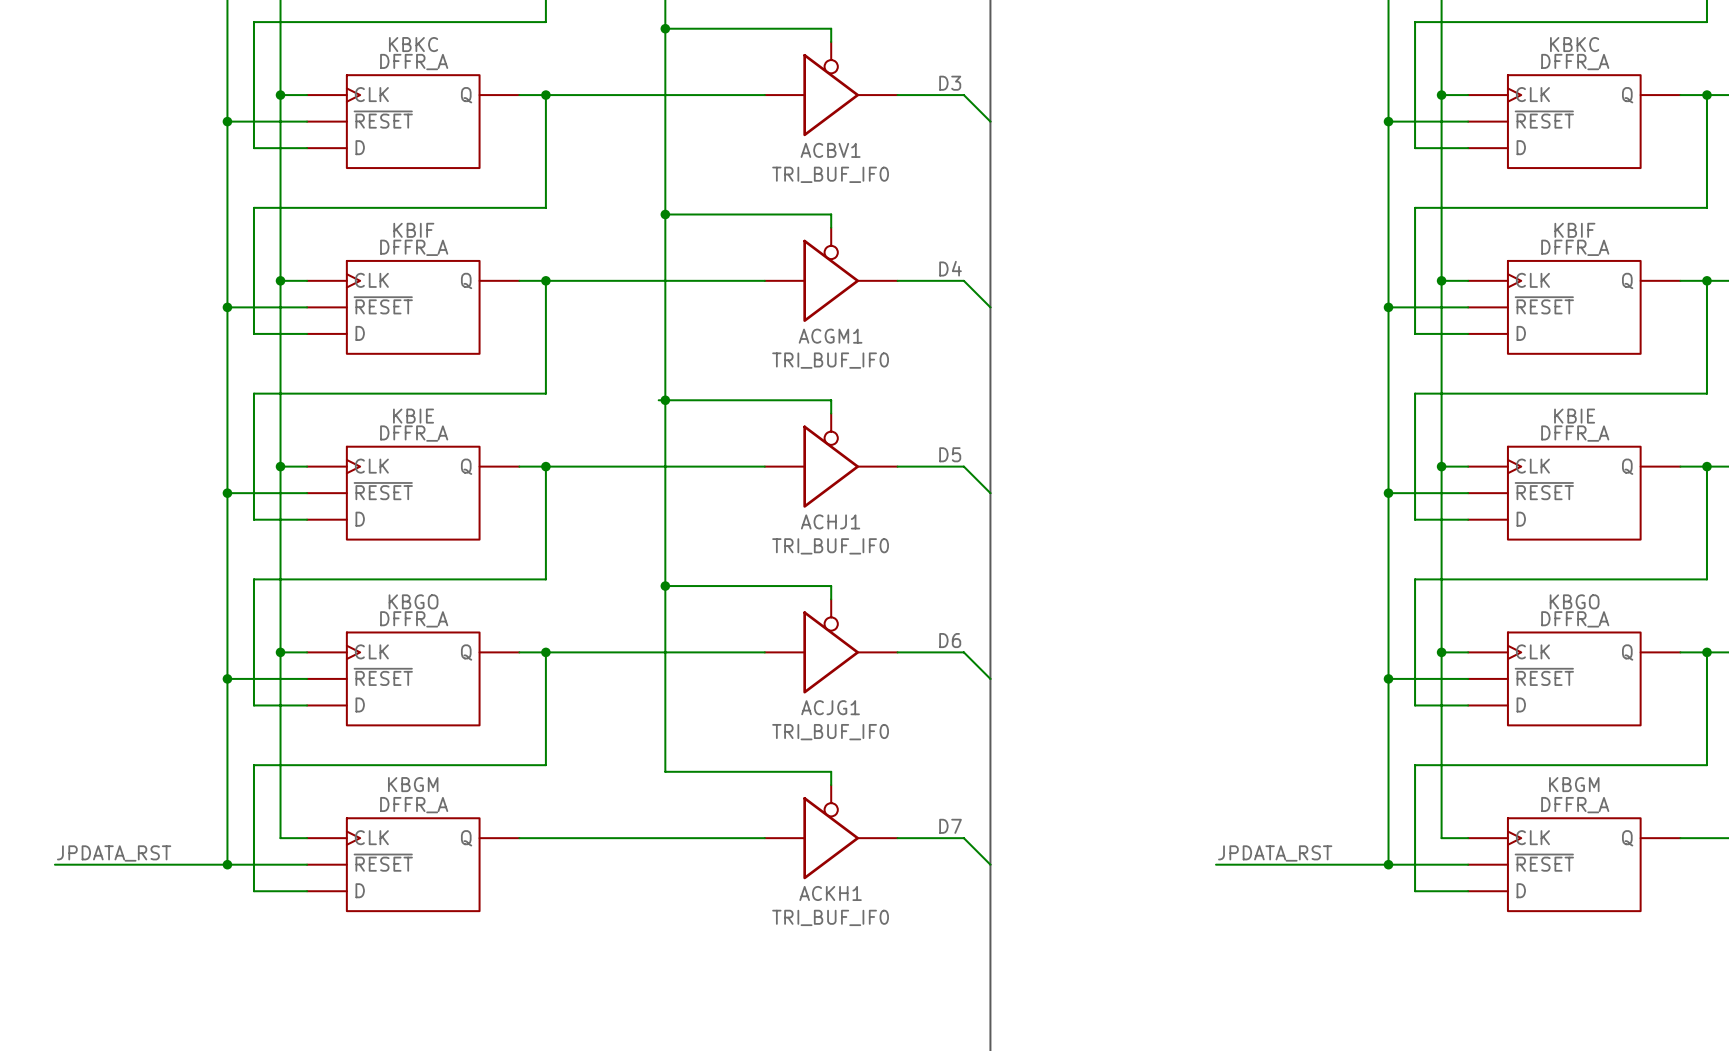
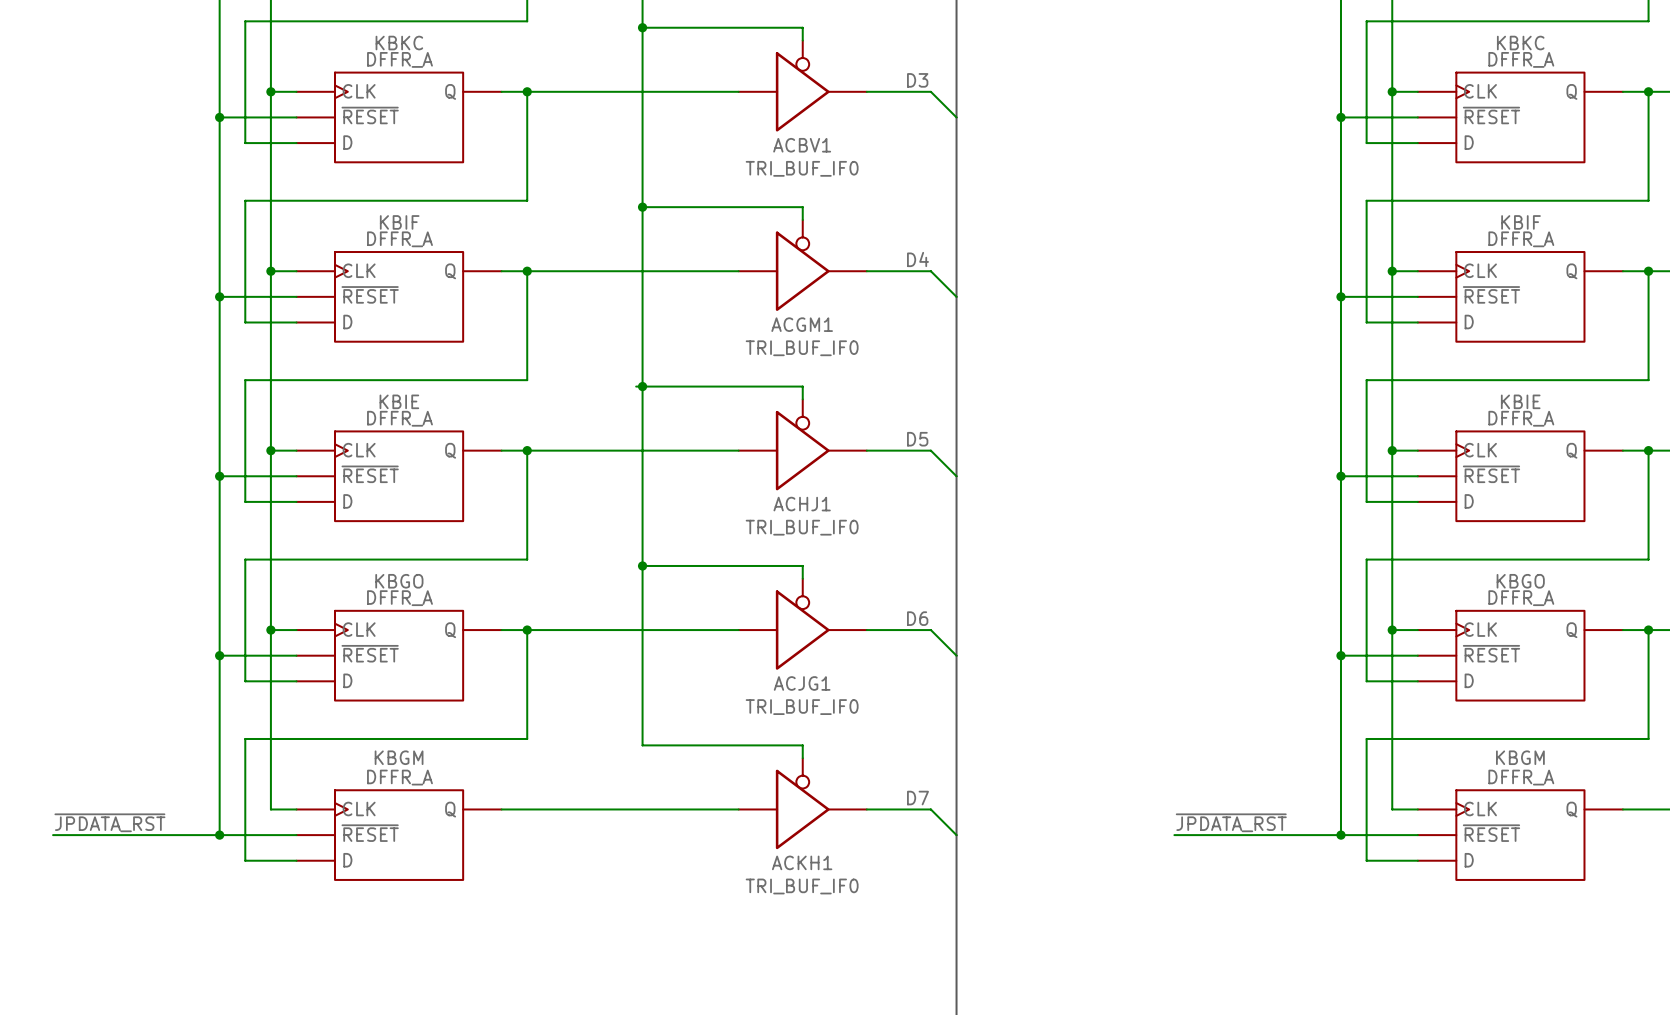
label: JPDATA_RST (114, 853) -> ~{JPDATA_RST} (109, 822)
label: JPDATA_RST (1275, 853) -> ~{JPDATA_RST} (1231, 822)

